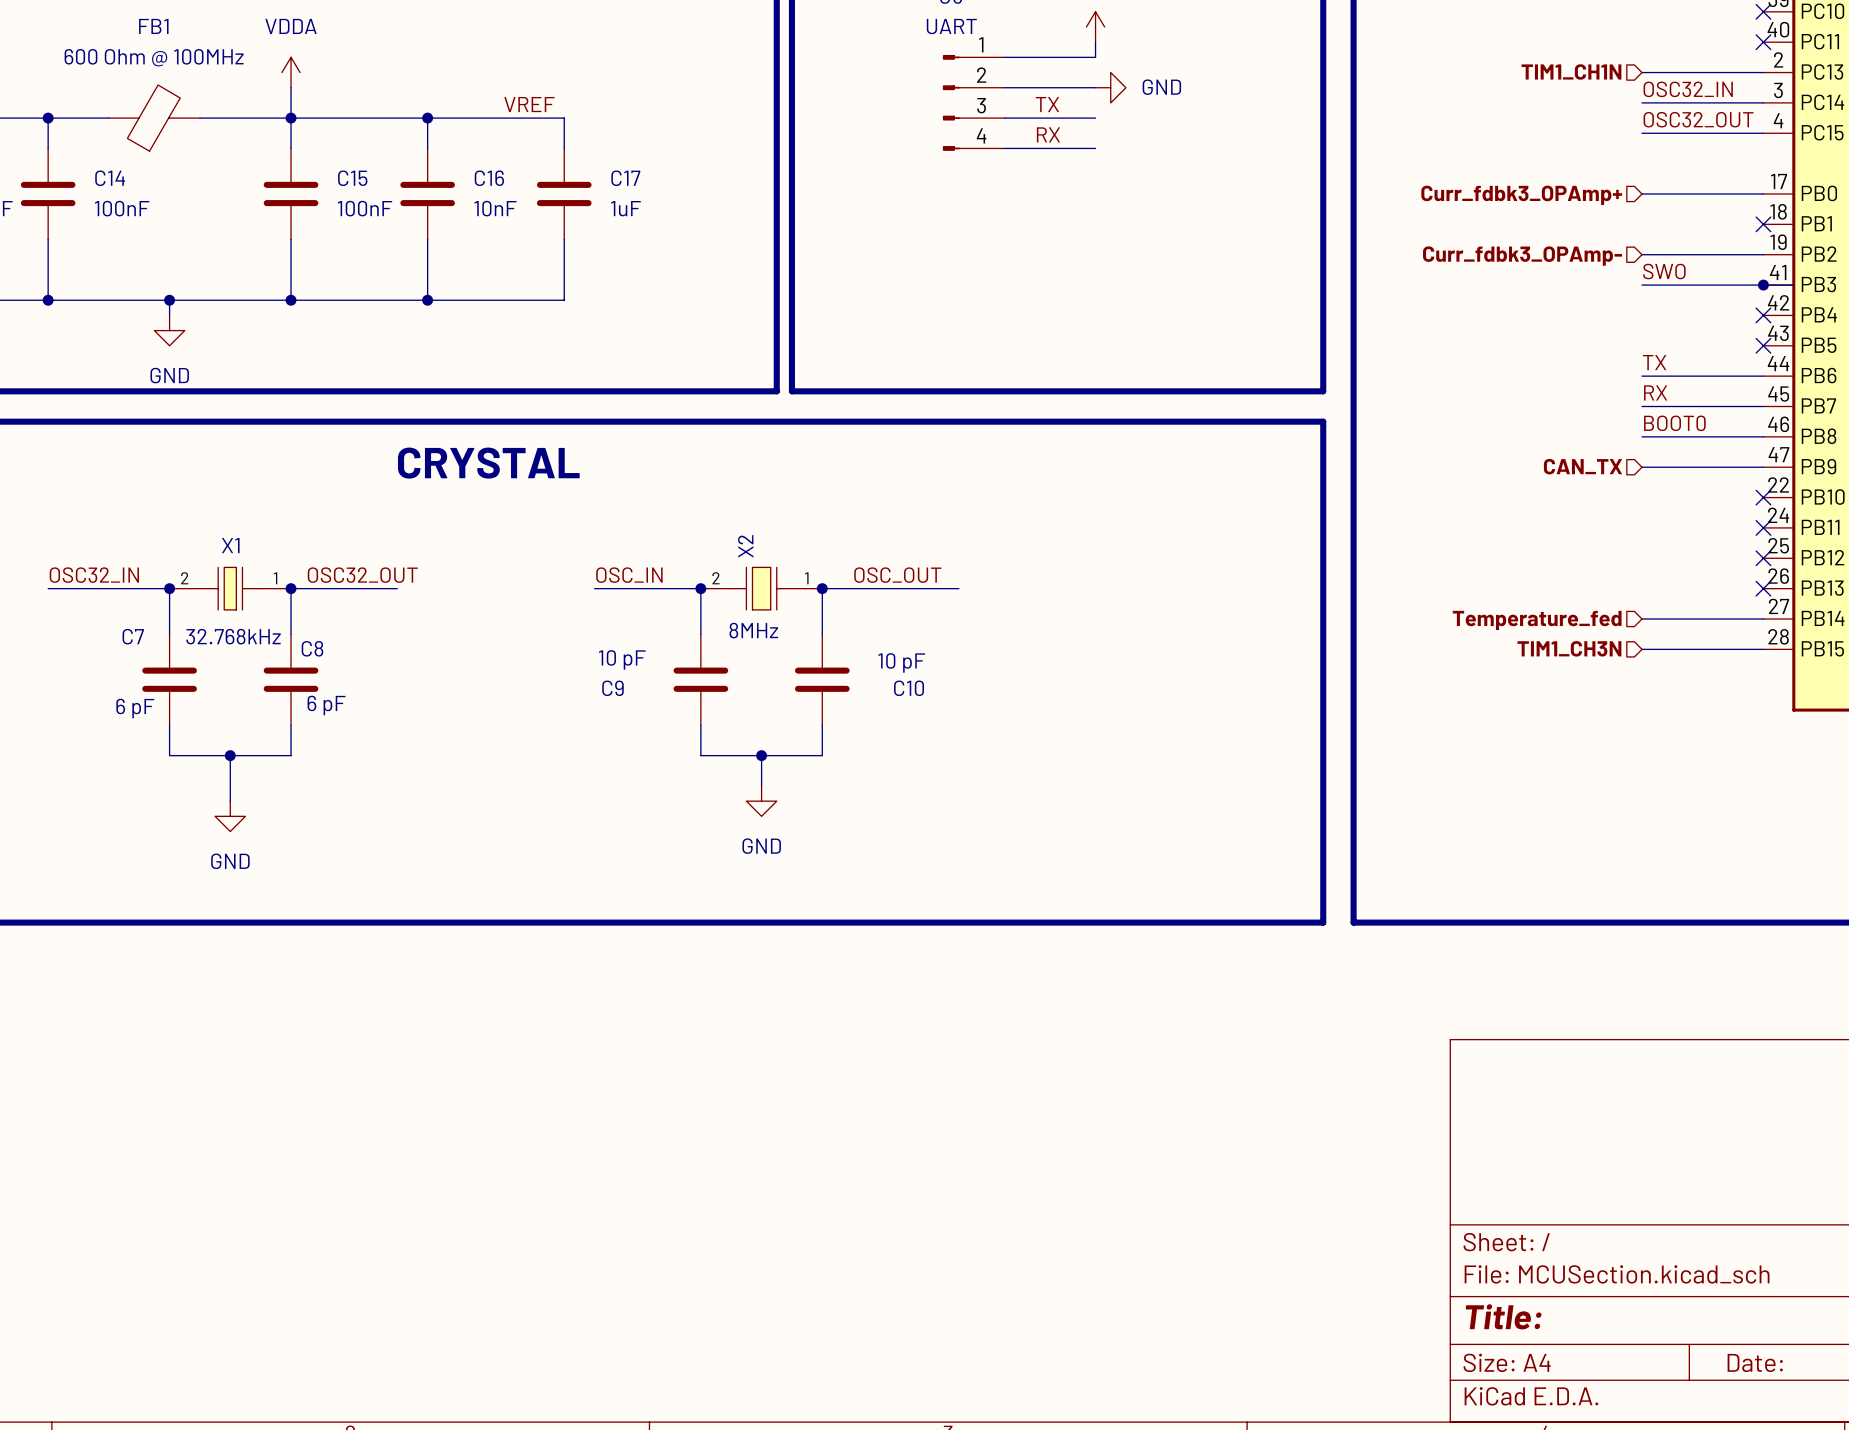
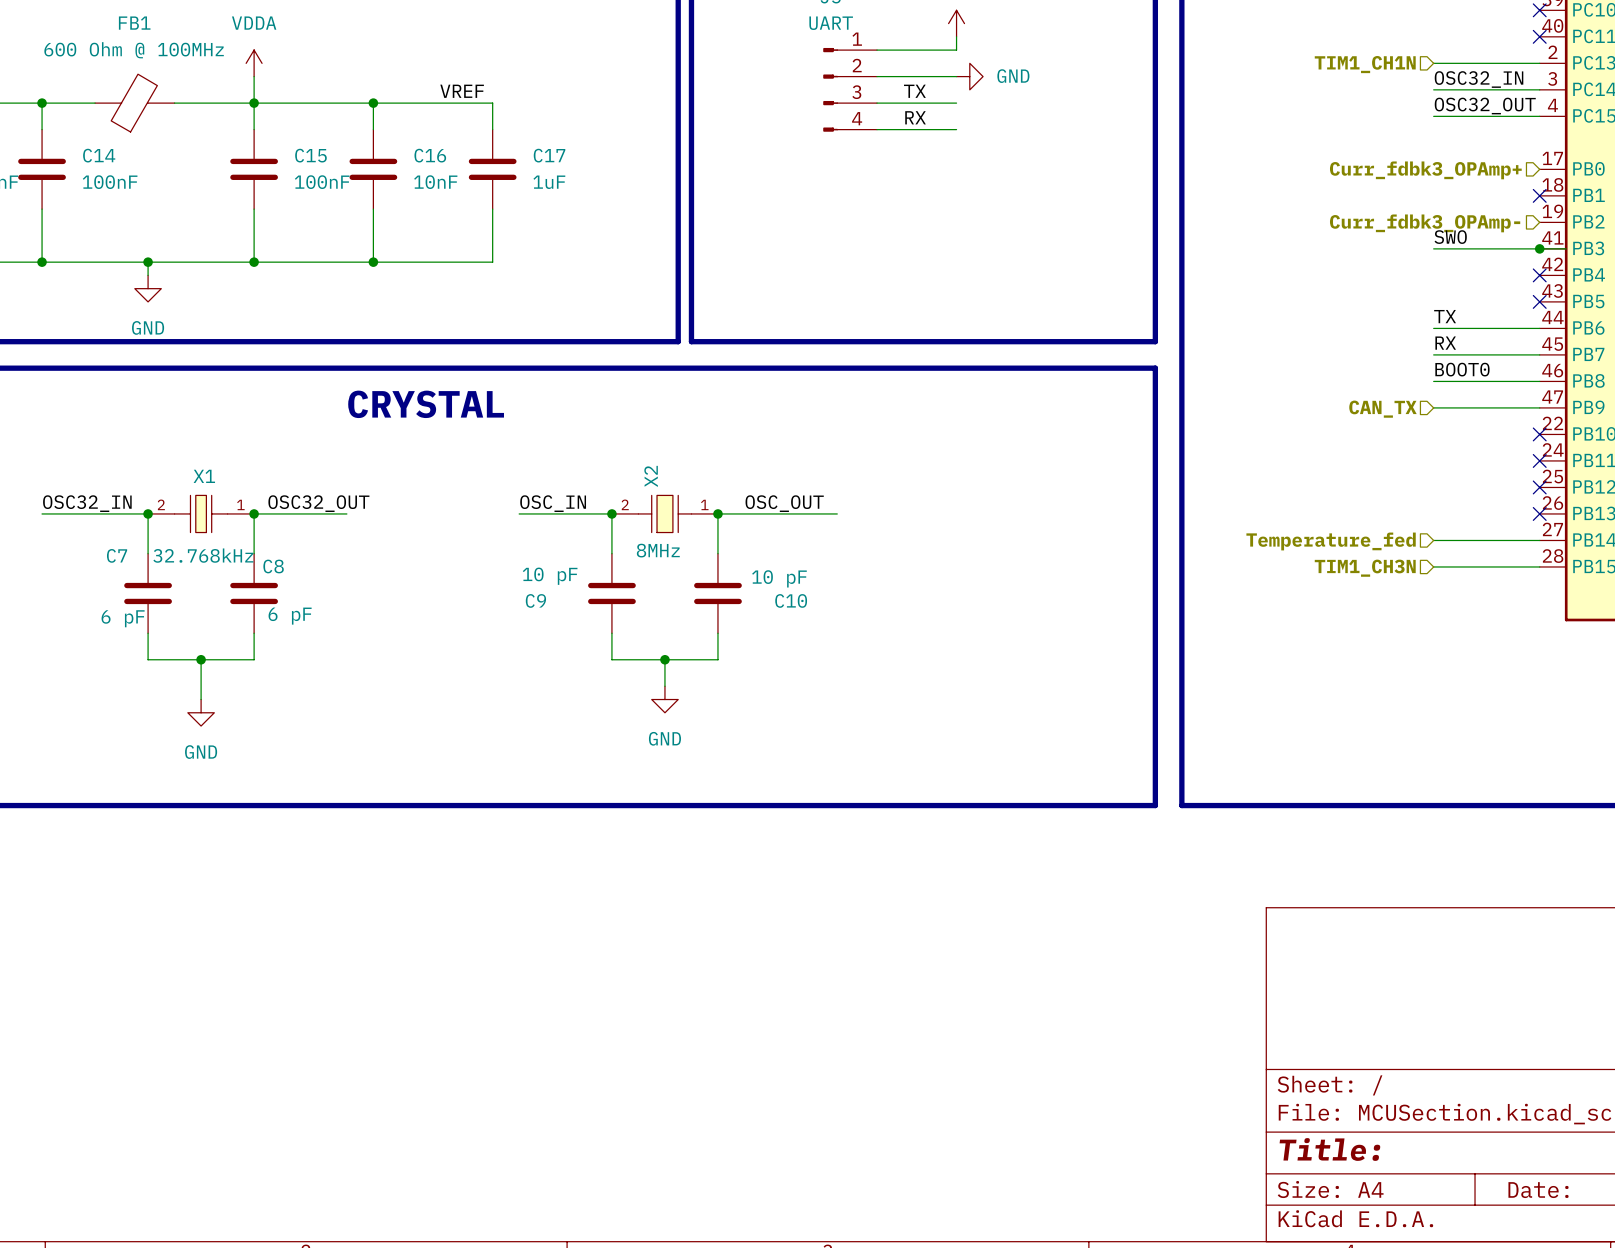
wire: (1642, 193) (1763, 193) -> none
hierarchical label position: Curr_fdbk3_OPAmp+ (1521, 195) -> Curr_fdbk3_OPAmp+ (1425, 170)
wire: (1642, 254) (1763, 254) -> none
hierarchical label position: Curr_fdbk3_OPAmp- (1522, 256) -> Curr_fdbk3_OPAmp- (1425, 223)

